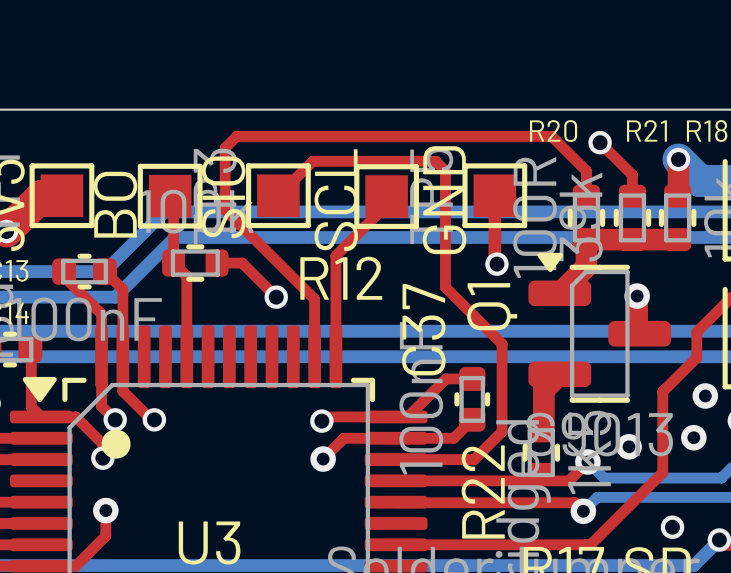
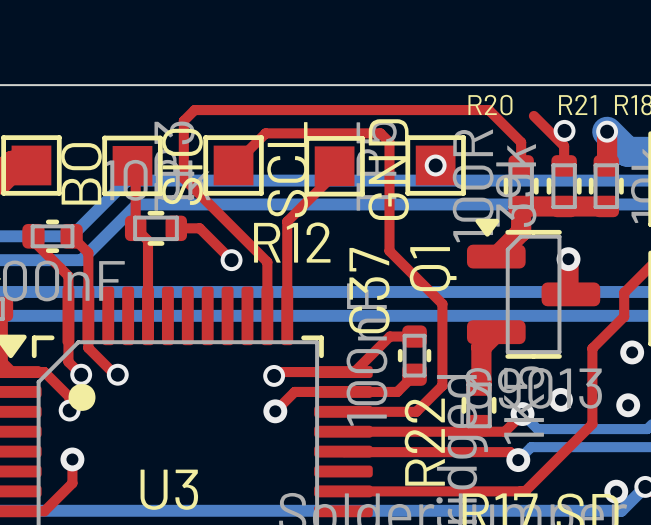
via position: (600, 142) -> (564, 130)
top track: (494, 195) (494, 261) (496, 264) -> none
via: none -> (435, 165)
via: (496, 264) -> none
via position: (693, 437) -> (628, 405)
via position: (672, 527) -> (616, 491)

